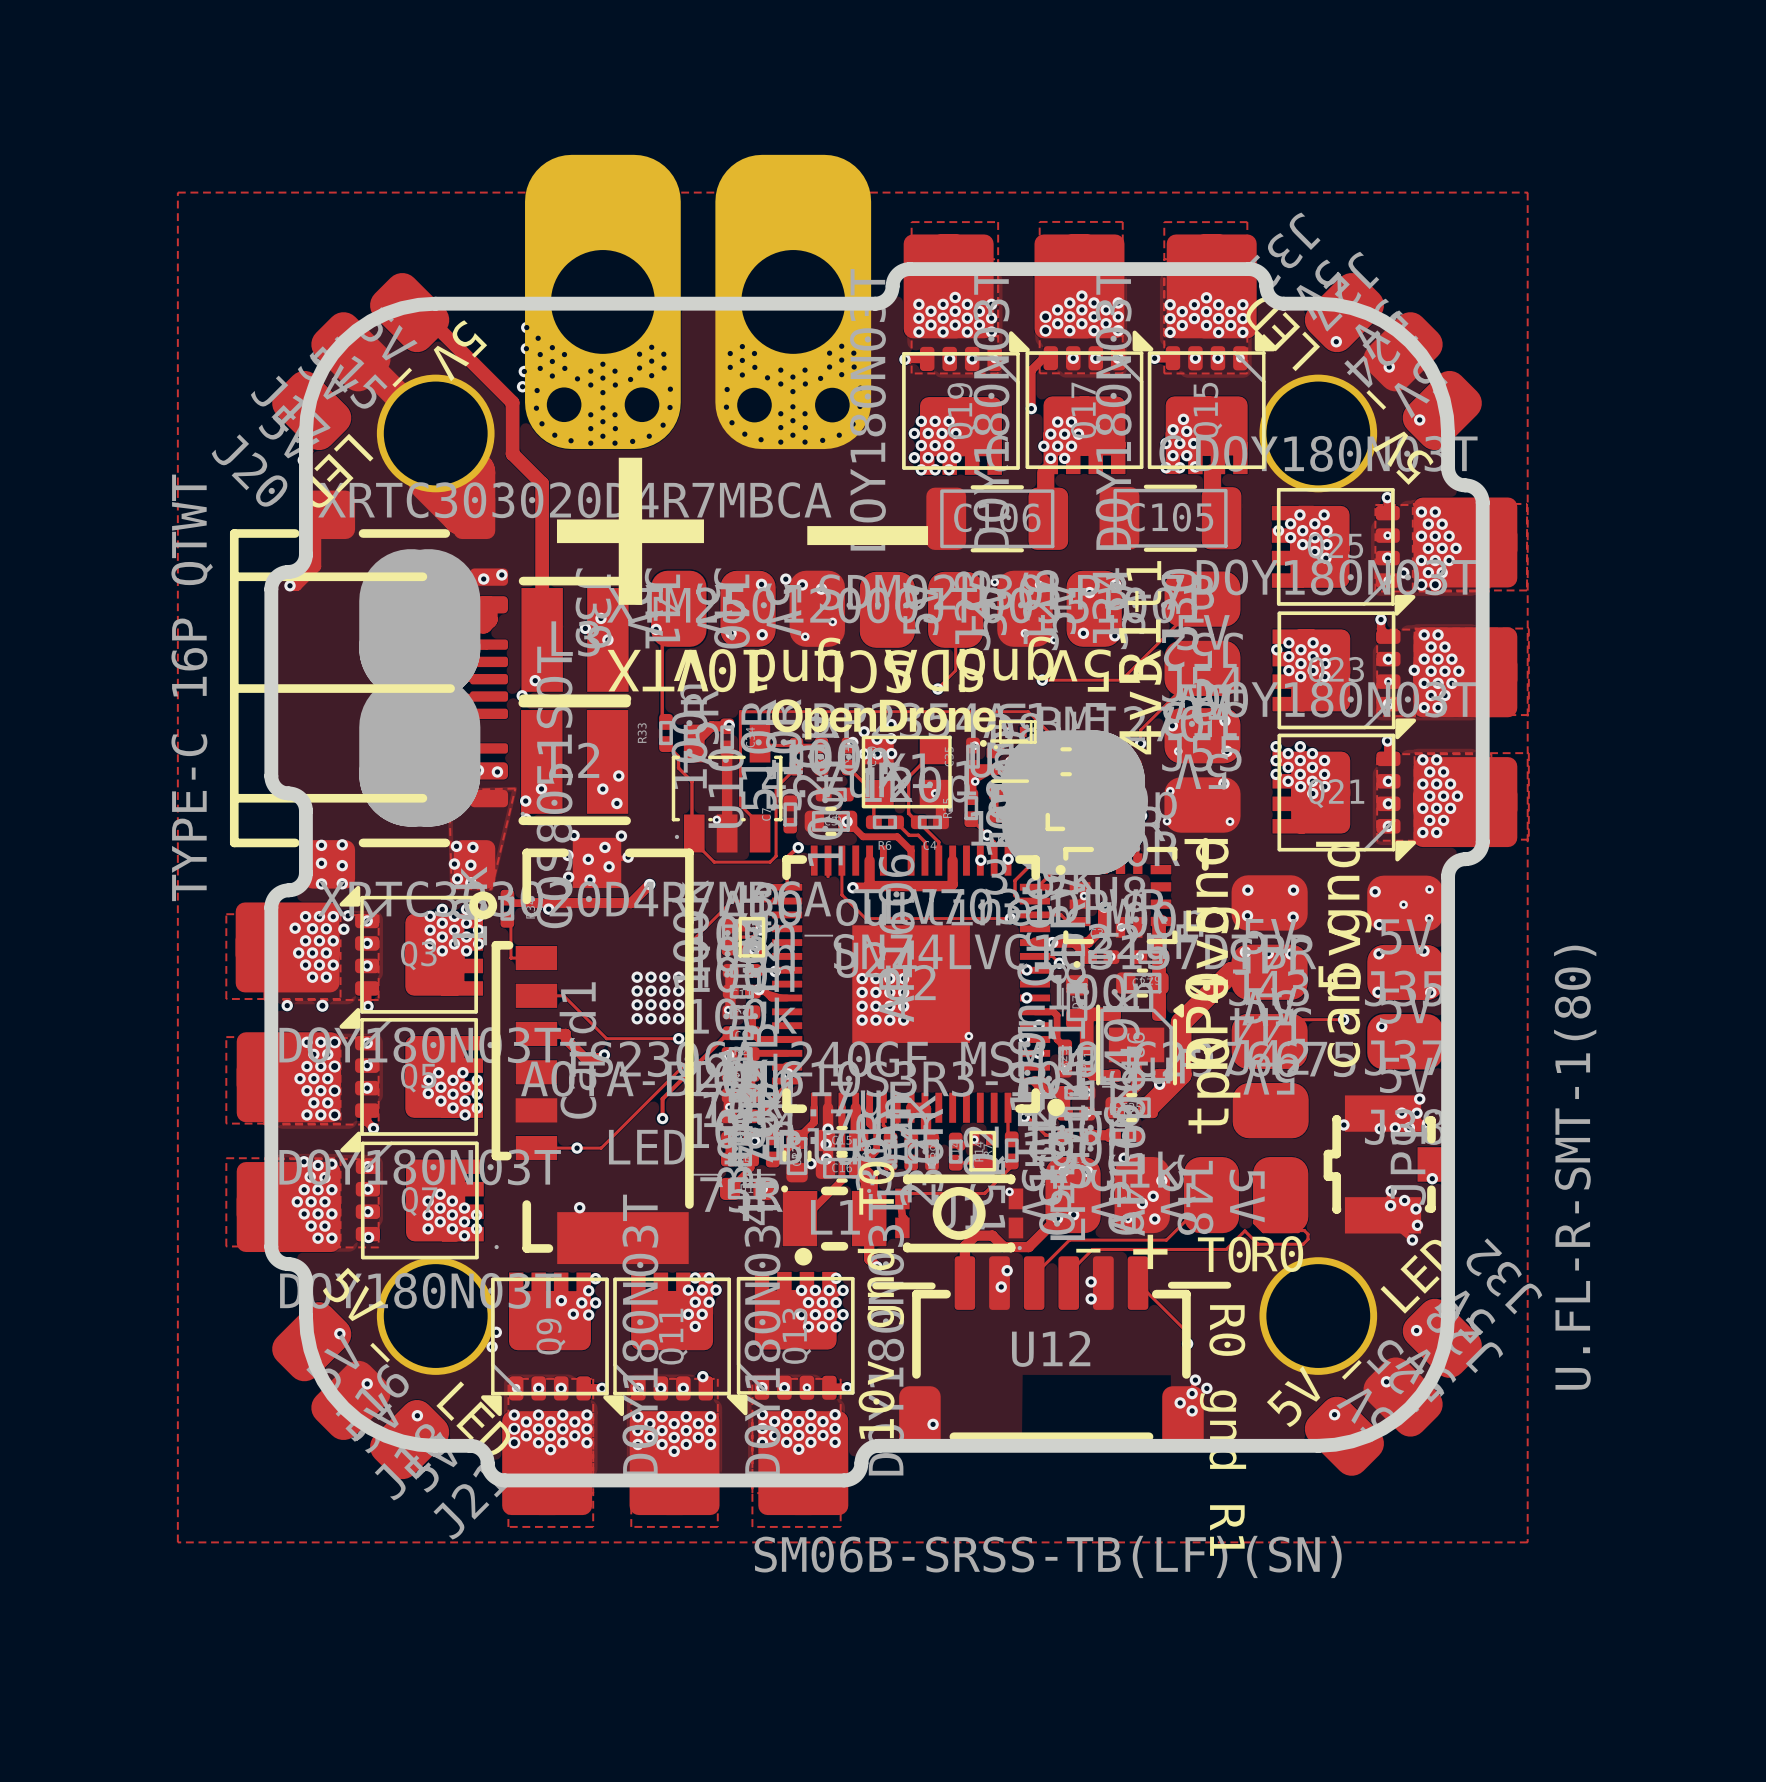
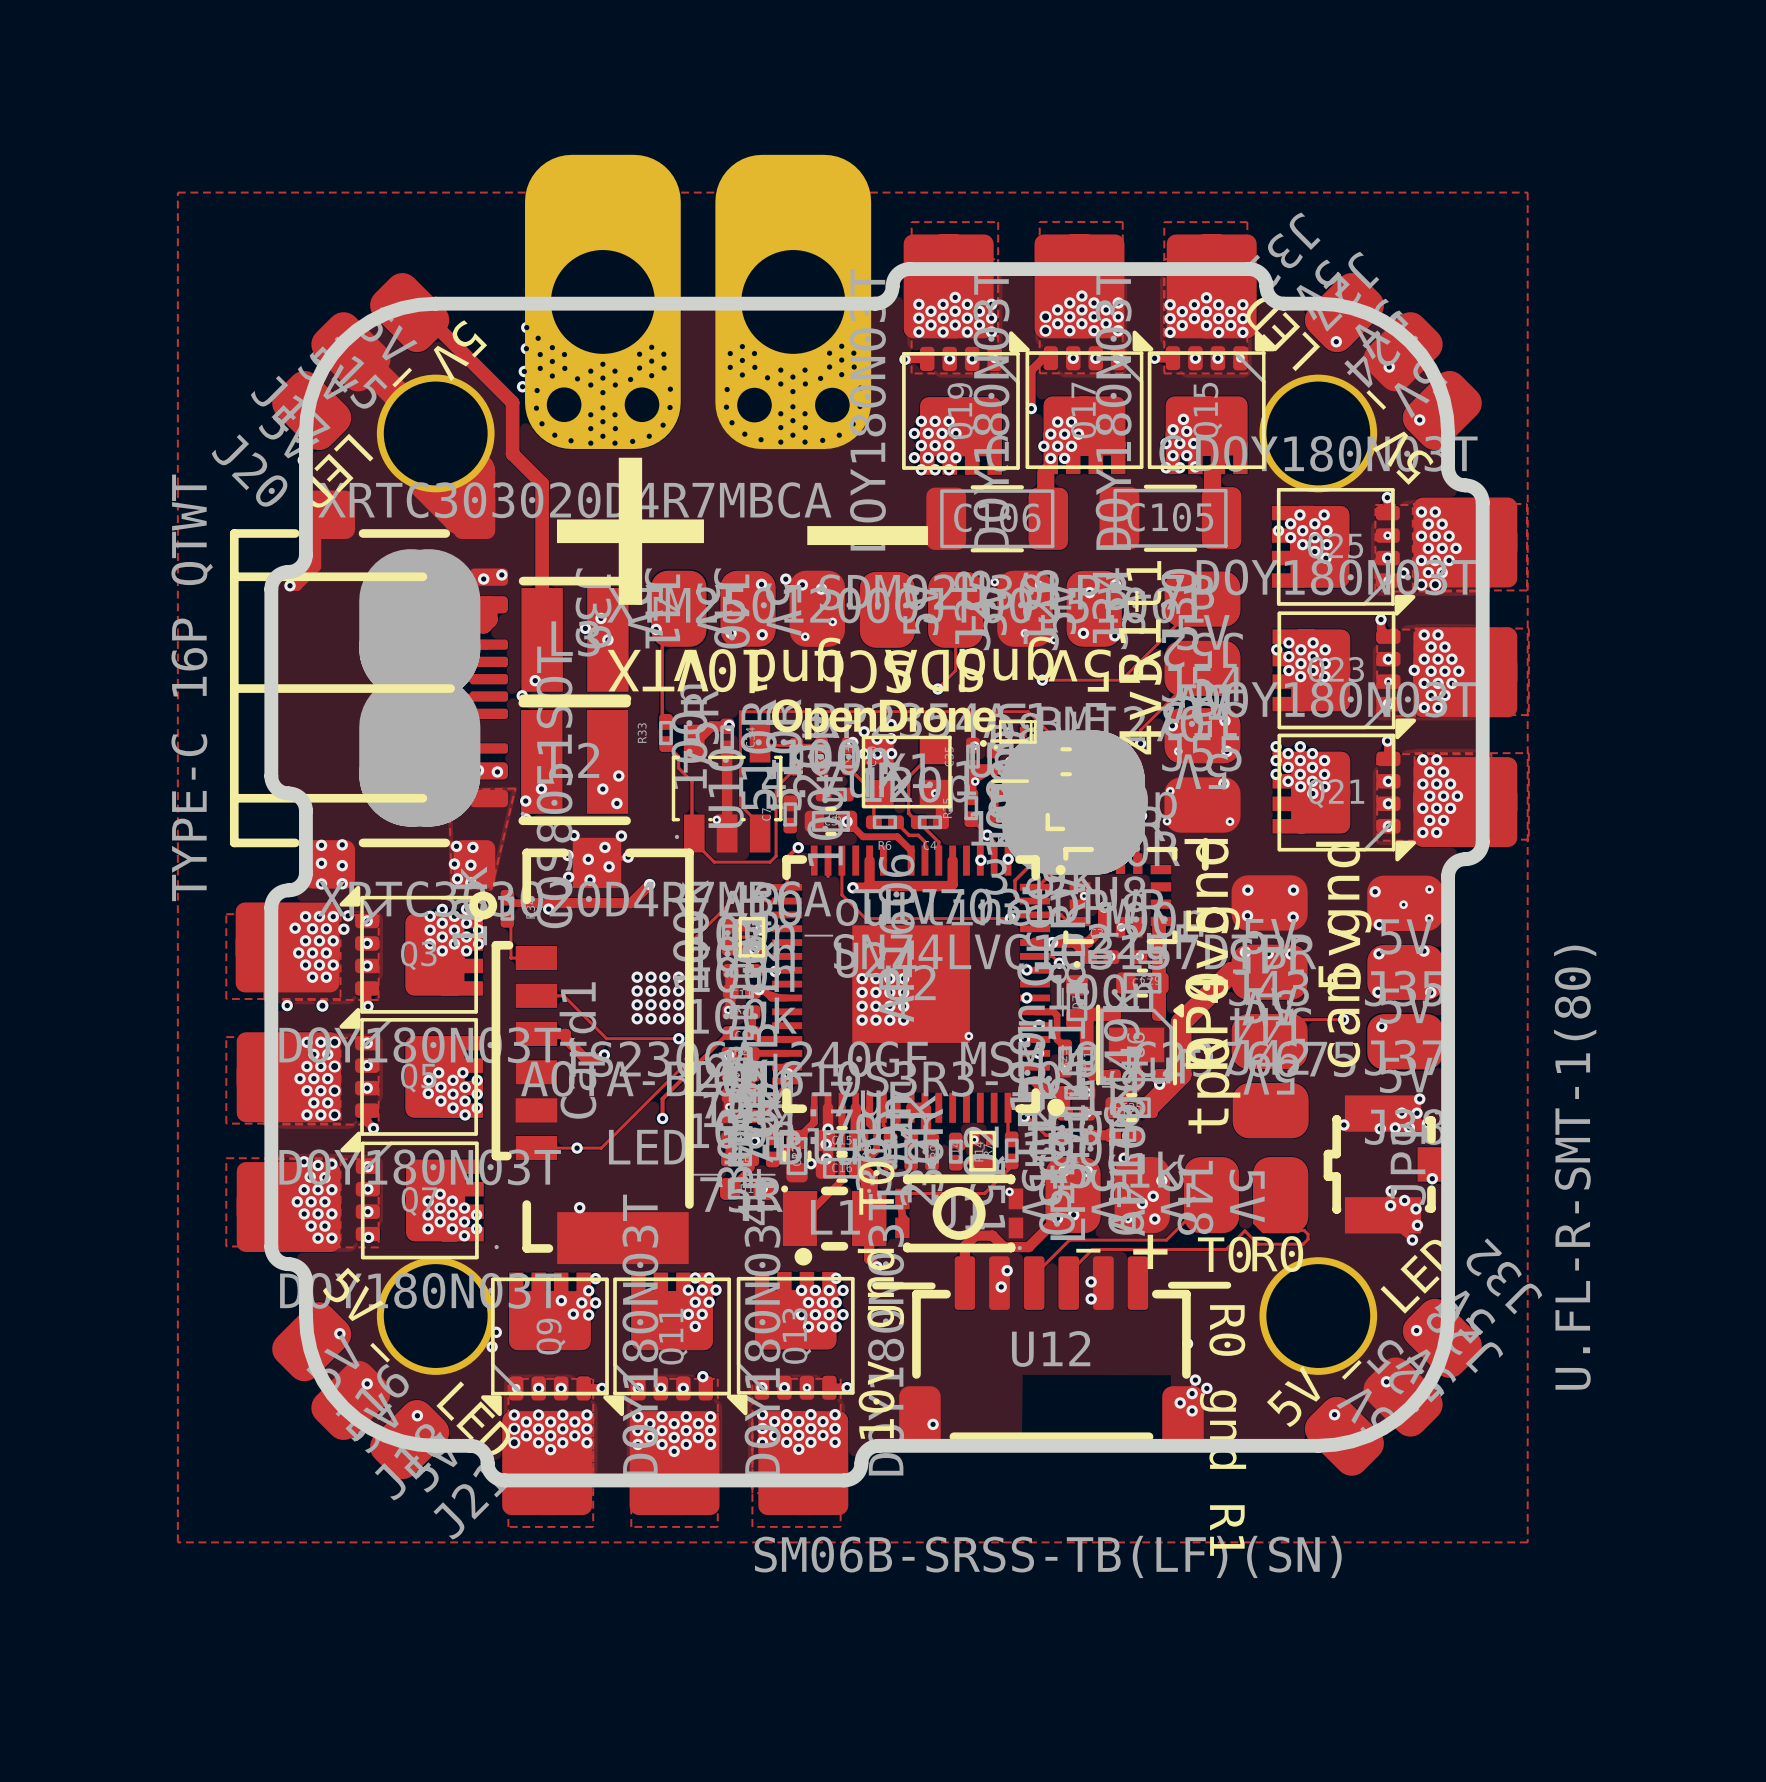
track: (1137, 1283) (1187, 1332) (1187, 1343) -> none

